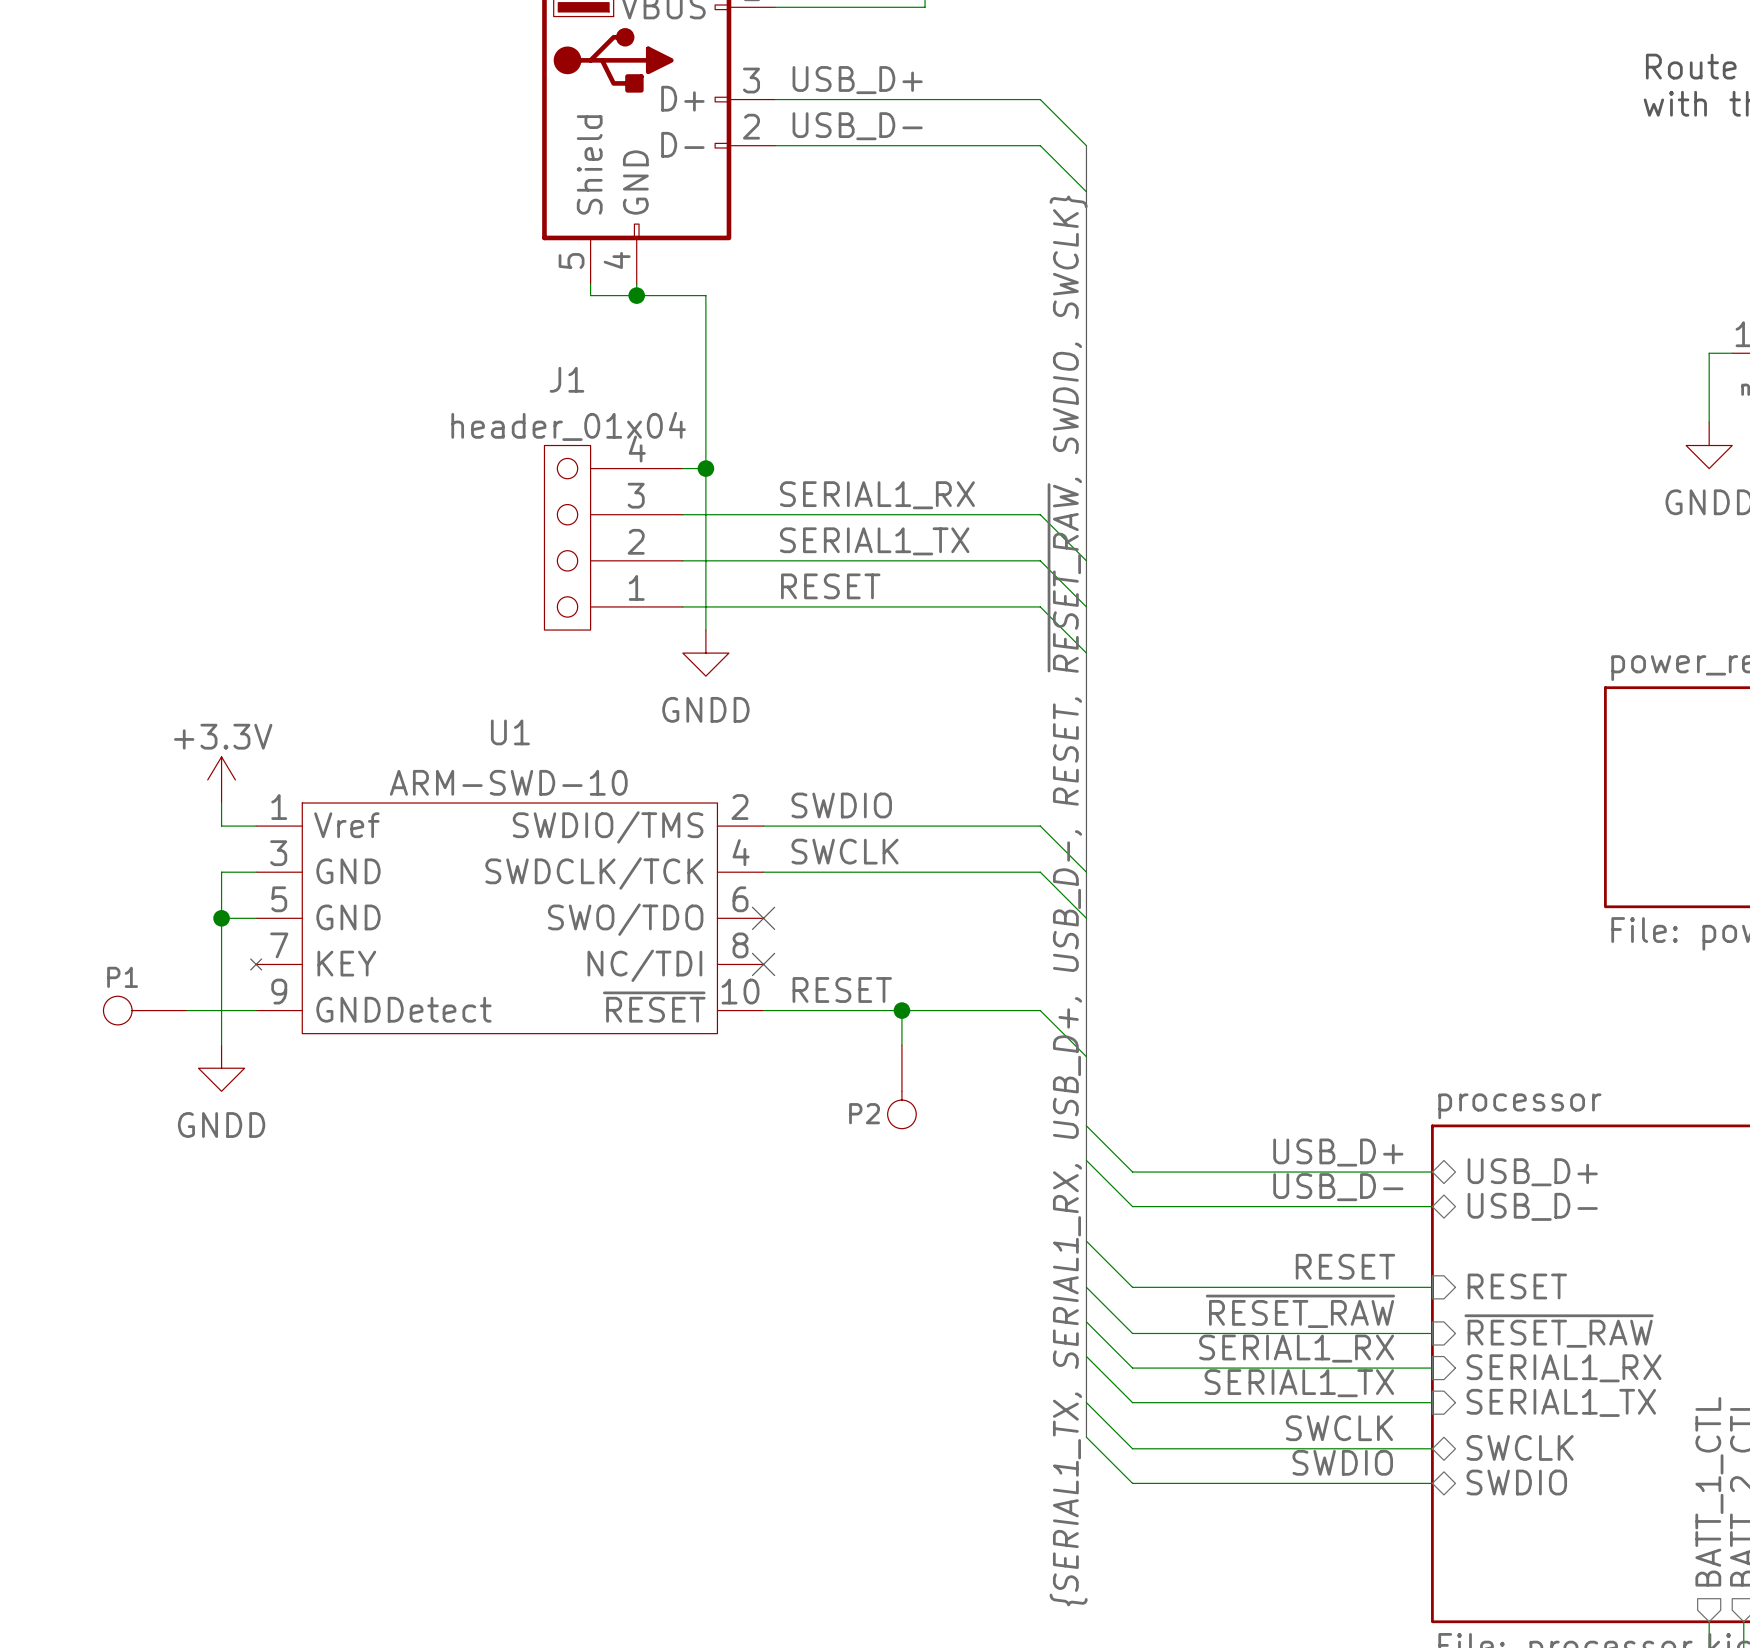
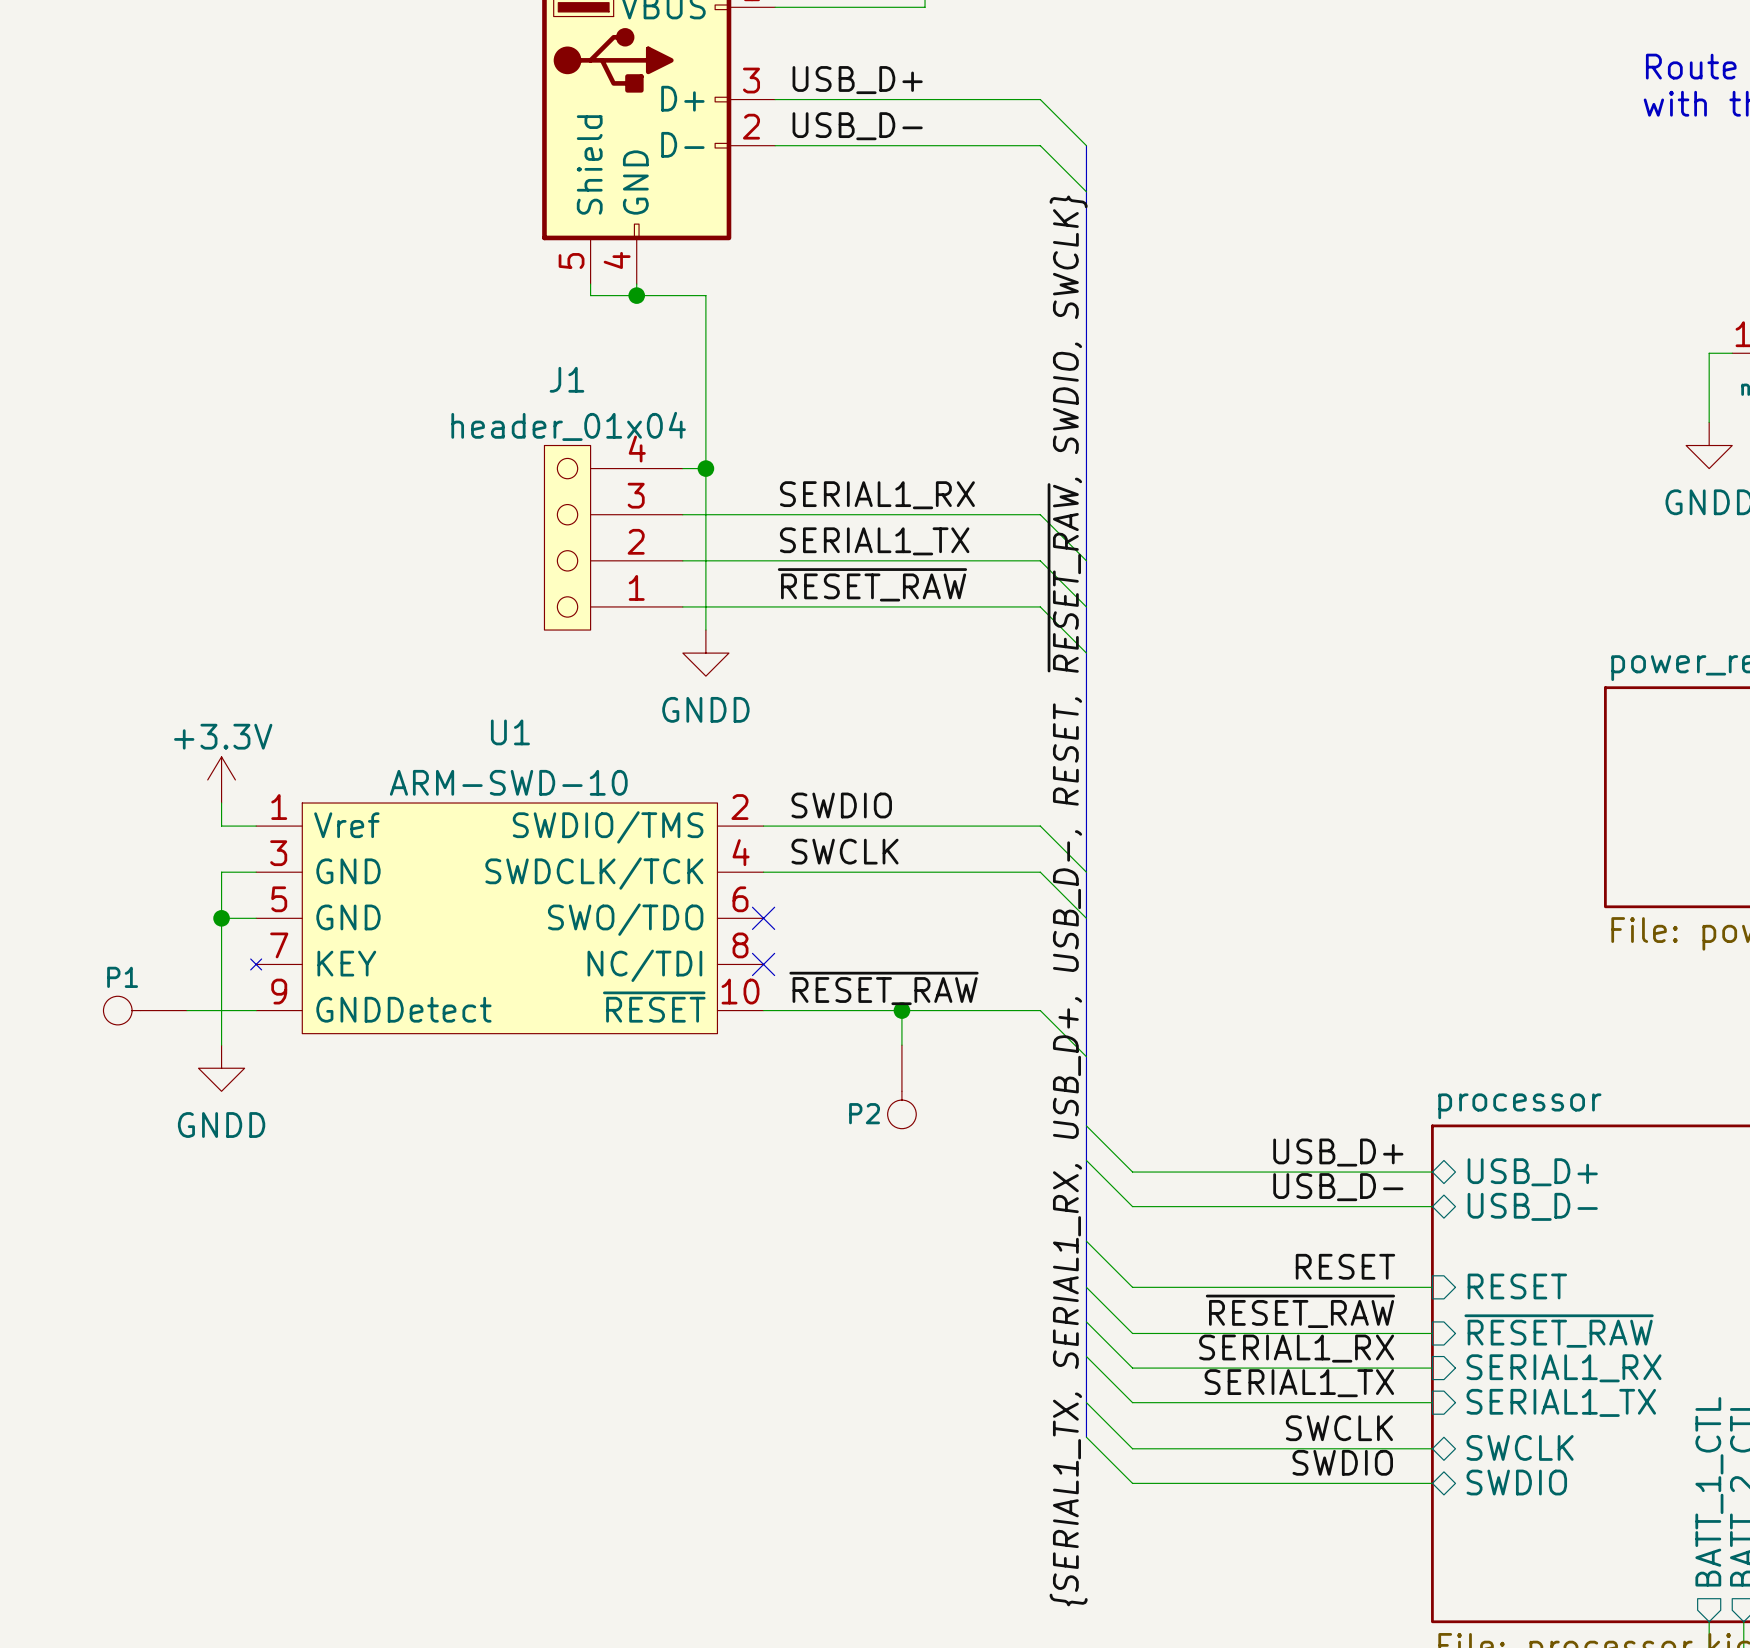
label: RESET (830, 586) -> ~{RESET_RAW} (872, 584)
label: RESET (842, 990) -> ~{RESET_RAW} (884, 988)

